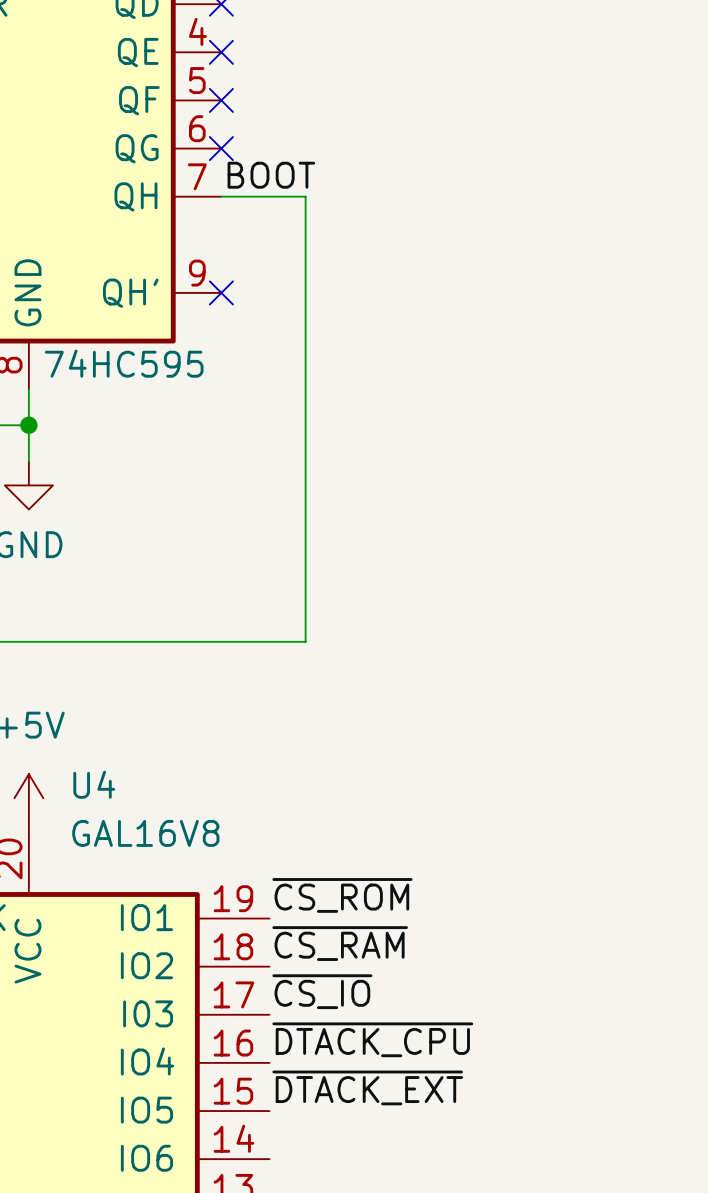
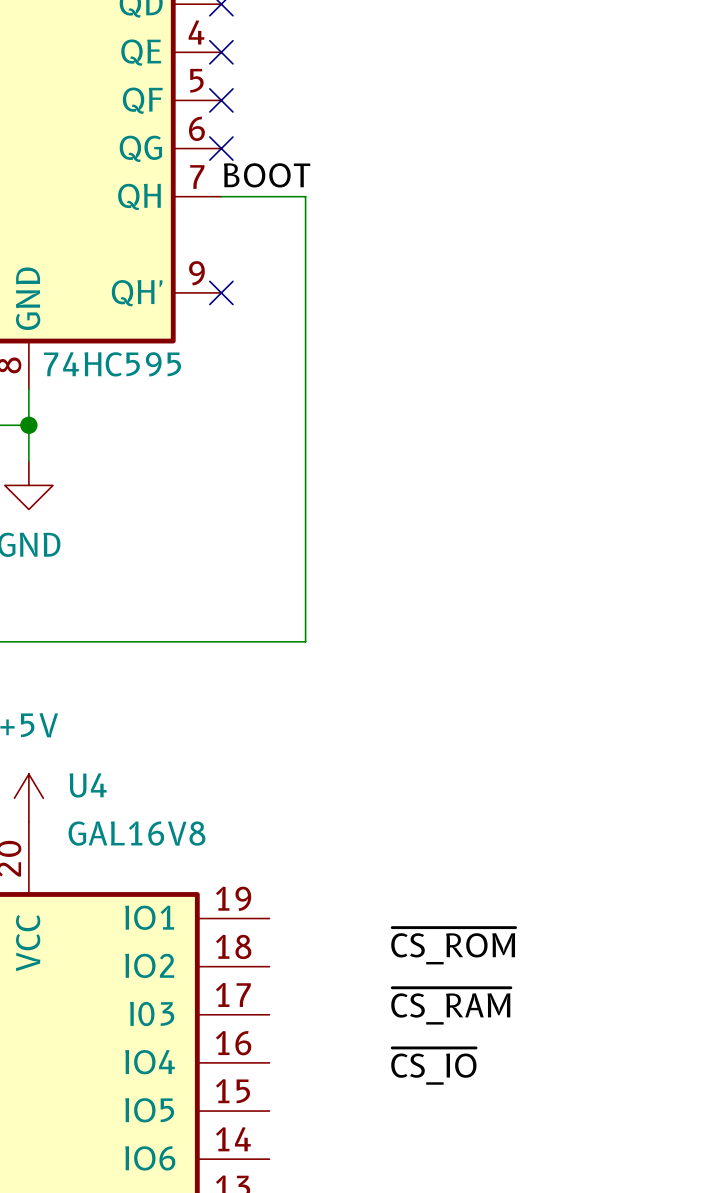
label position: ~{CS_ROM} (342, 895) -> ~{CS_ROM} (453, 946)
label position: ~{CS_RAM} (340, 943) -> ~{CS_RAM} (451, 1006)
label position: ~{CS_IO} (322, 991) -> ~{CS_IO} (433, 1066)
label: ~{DTACK_CPU} (372, 1039) -> none
label: ~{DTACK_EXT} (367, 1087) -> none

